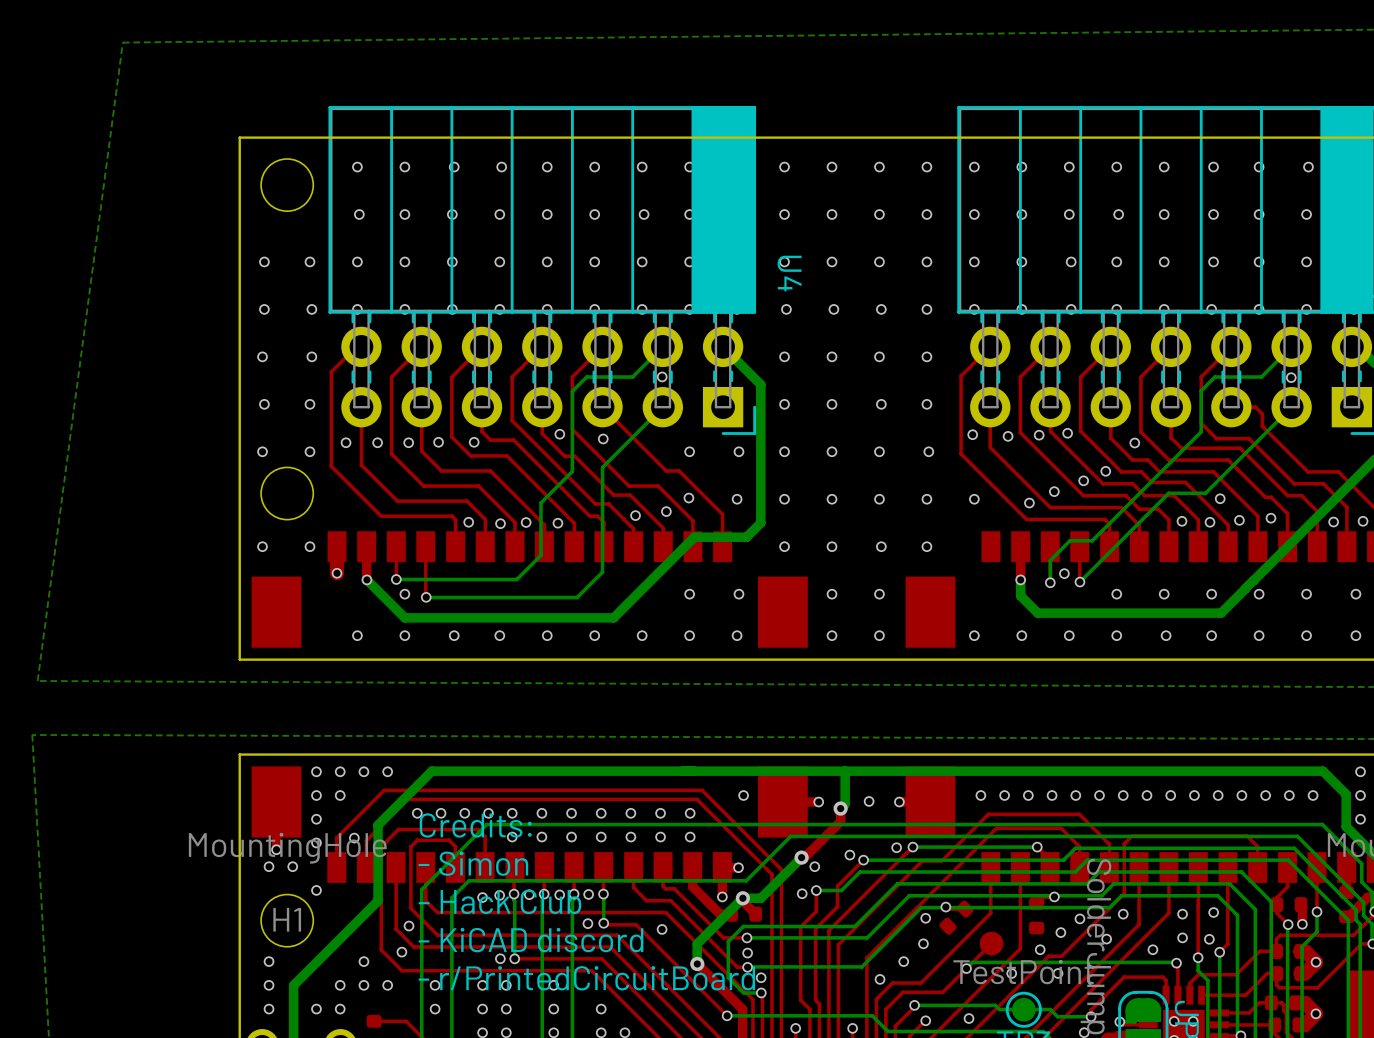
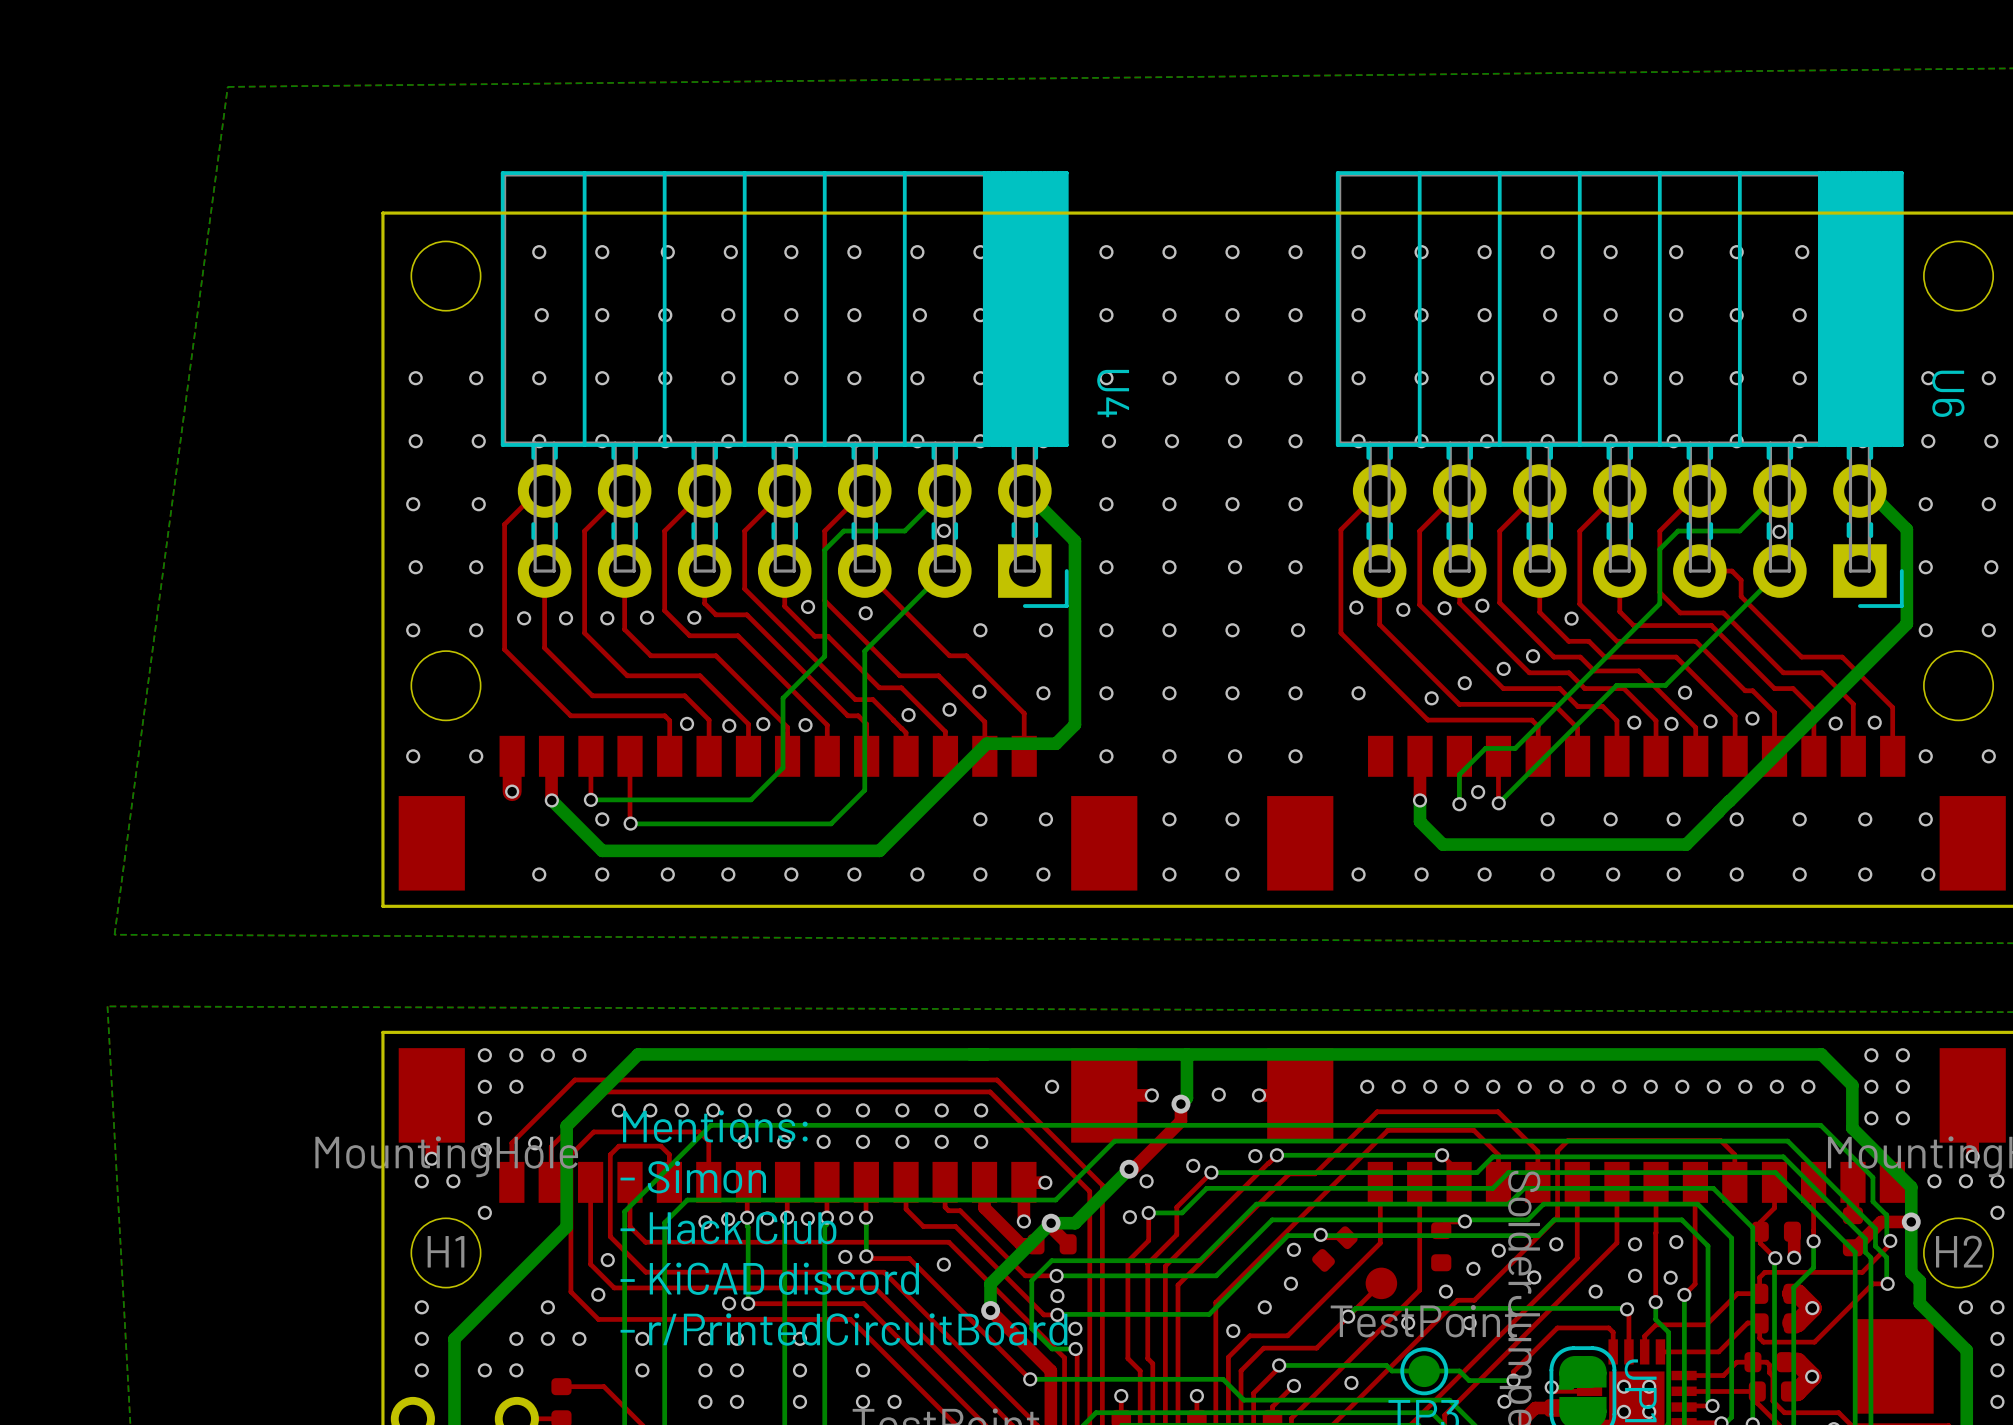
text: Credits: (475, 825) -> Mentions: (715, 1126)

